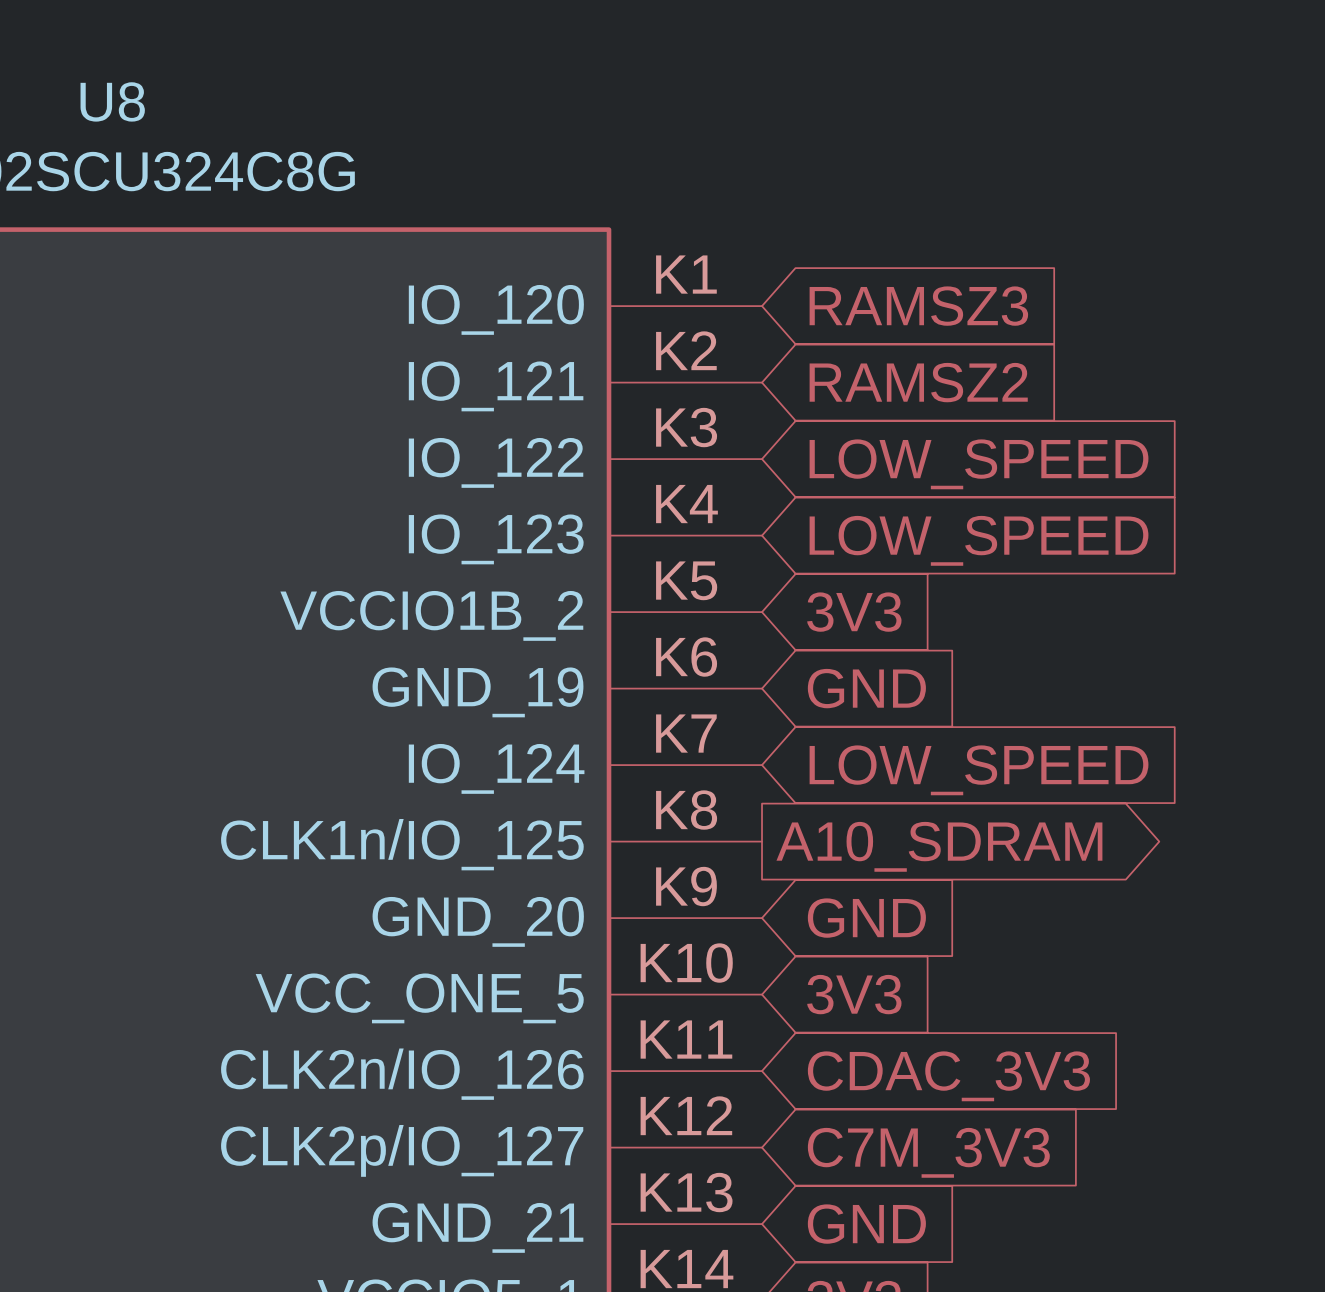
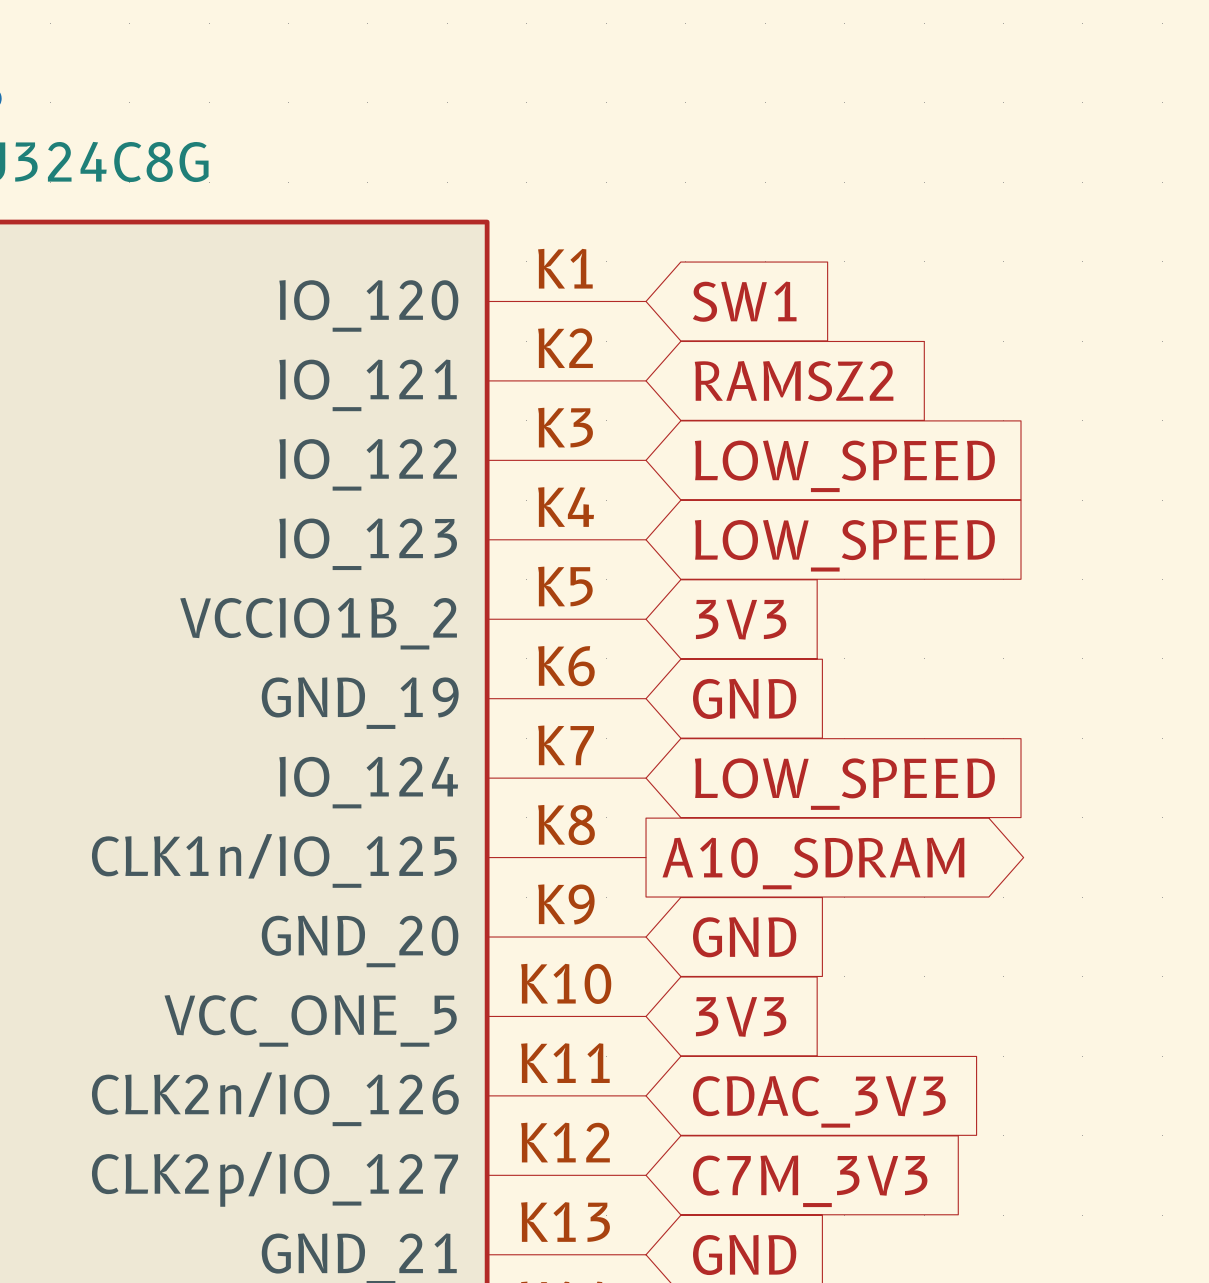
global label: RAMSZ3 (918, 306) -> SW1 (744, 301)

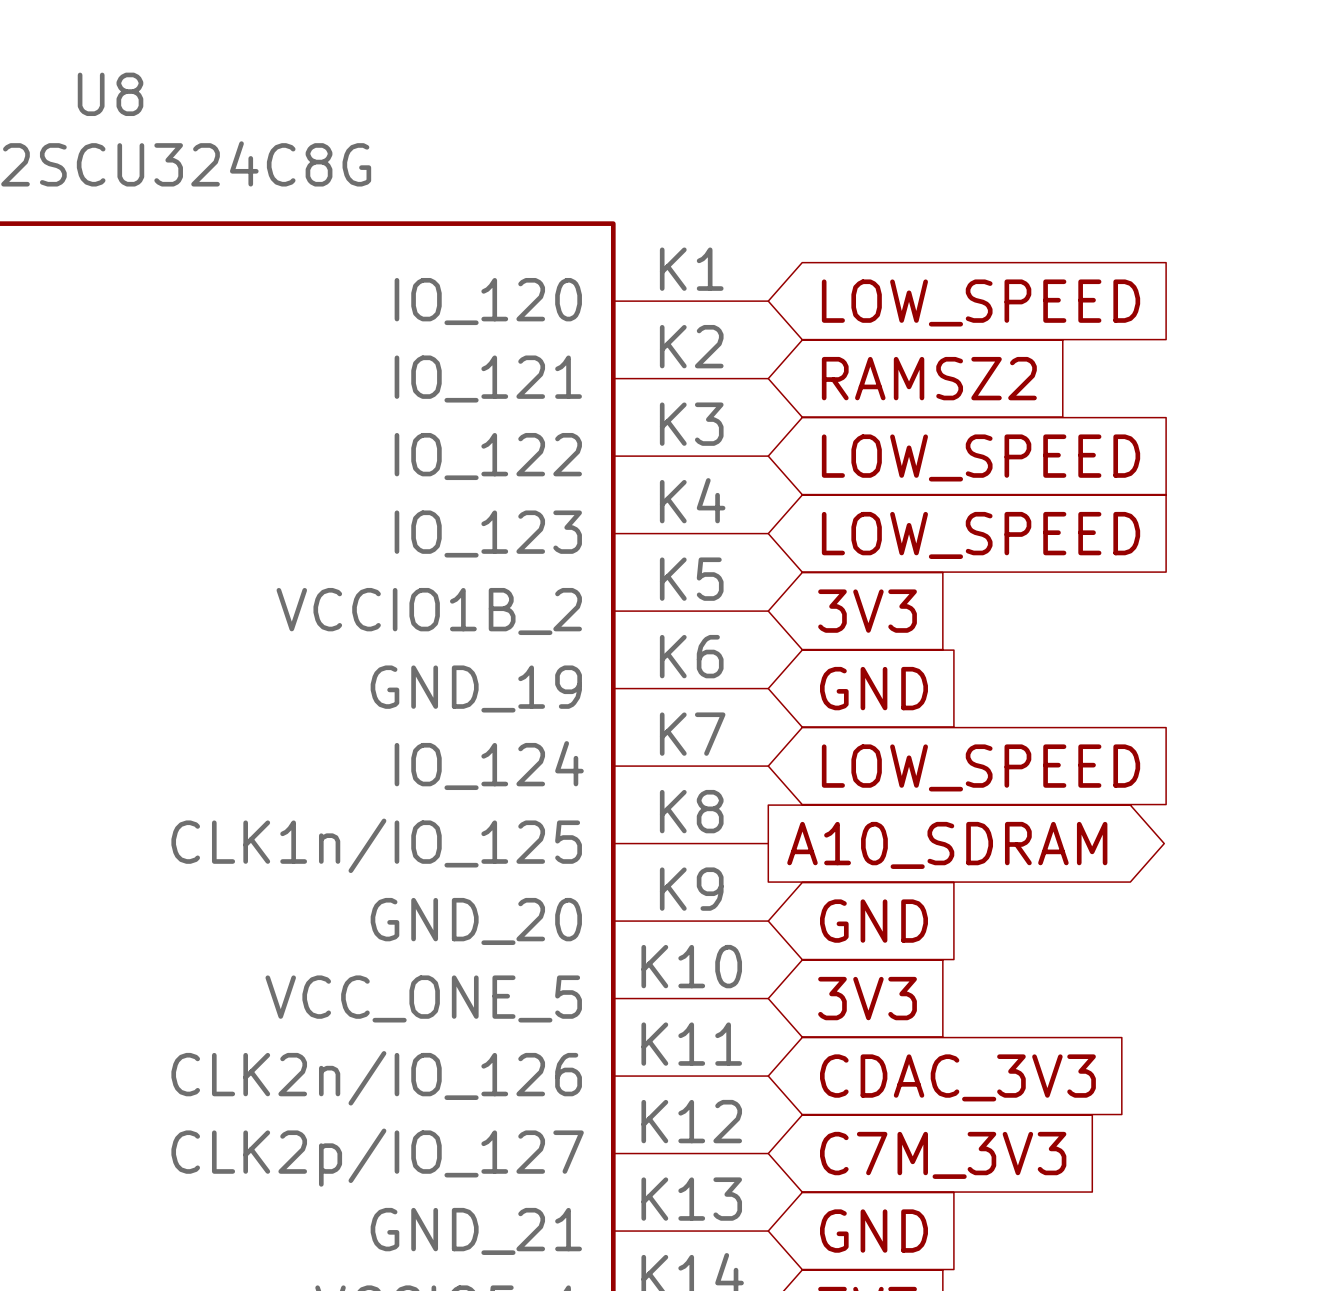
global label: SW1 (744, 301) -> LOW_SPEED (981, 302)

